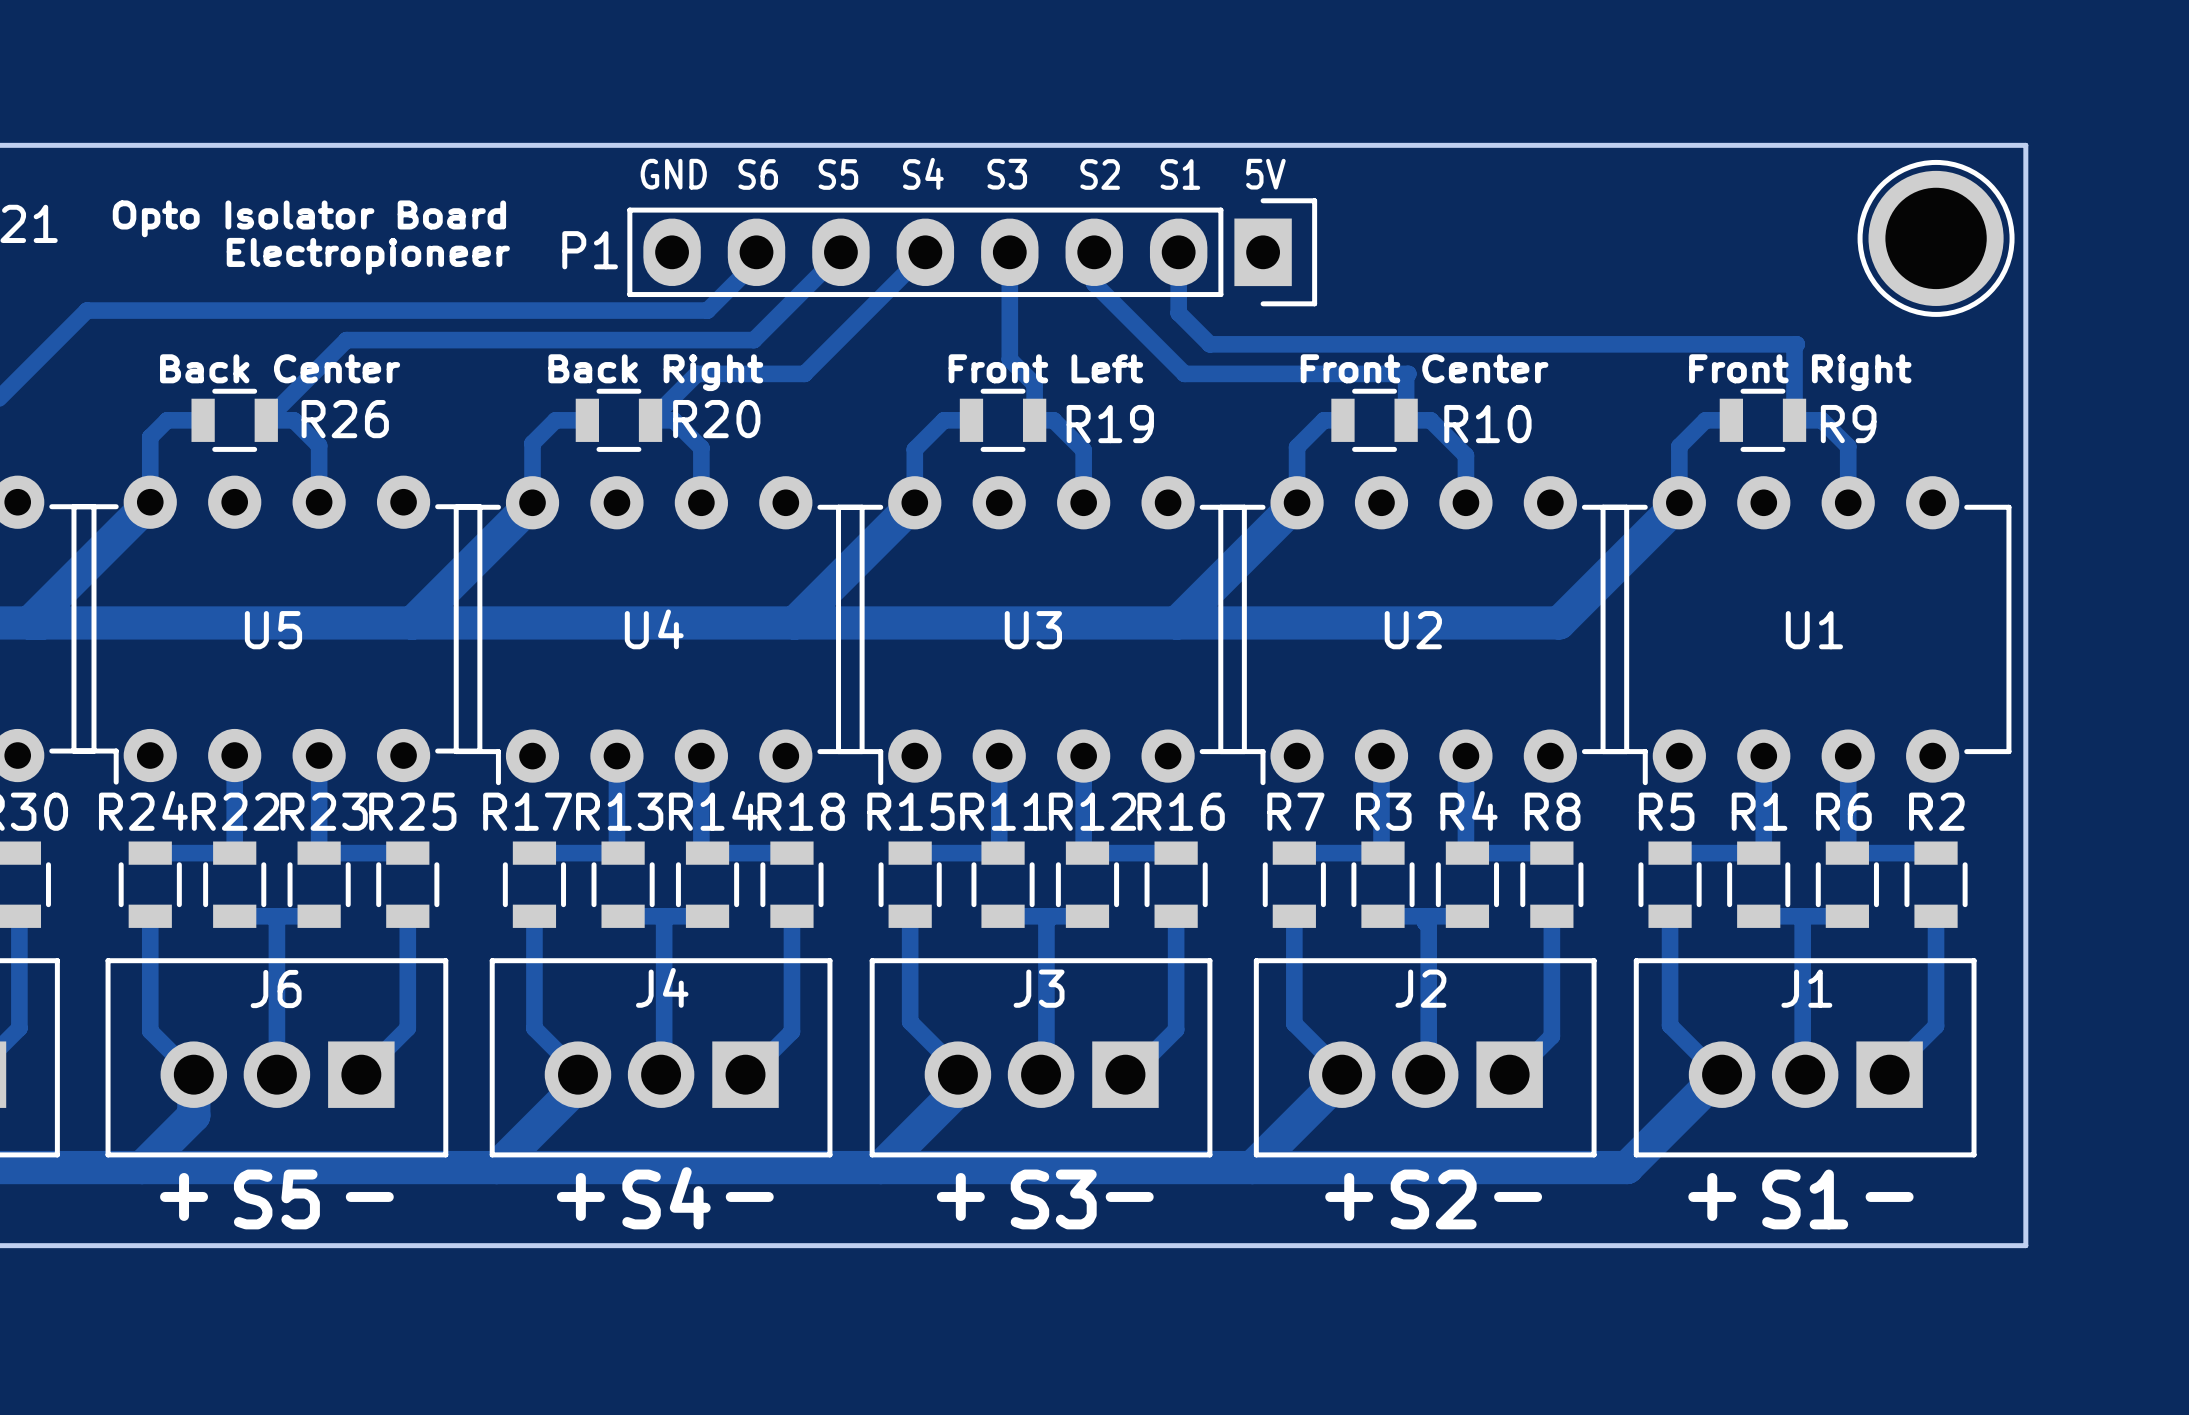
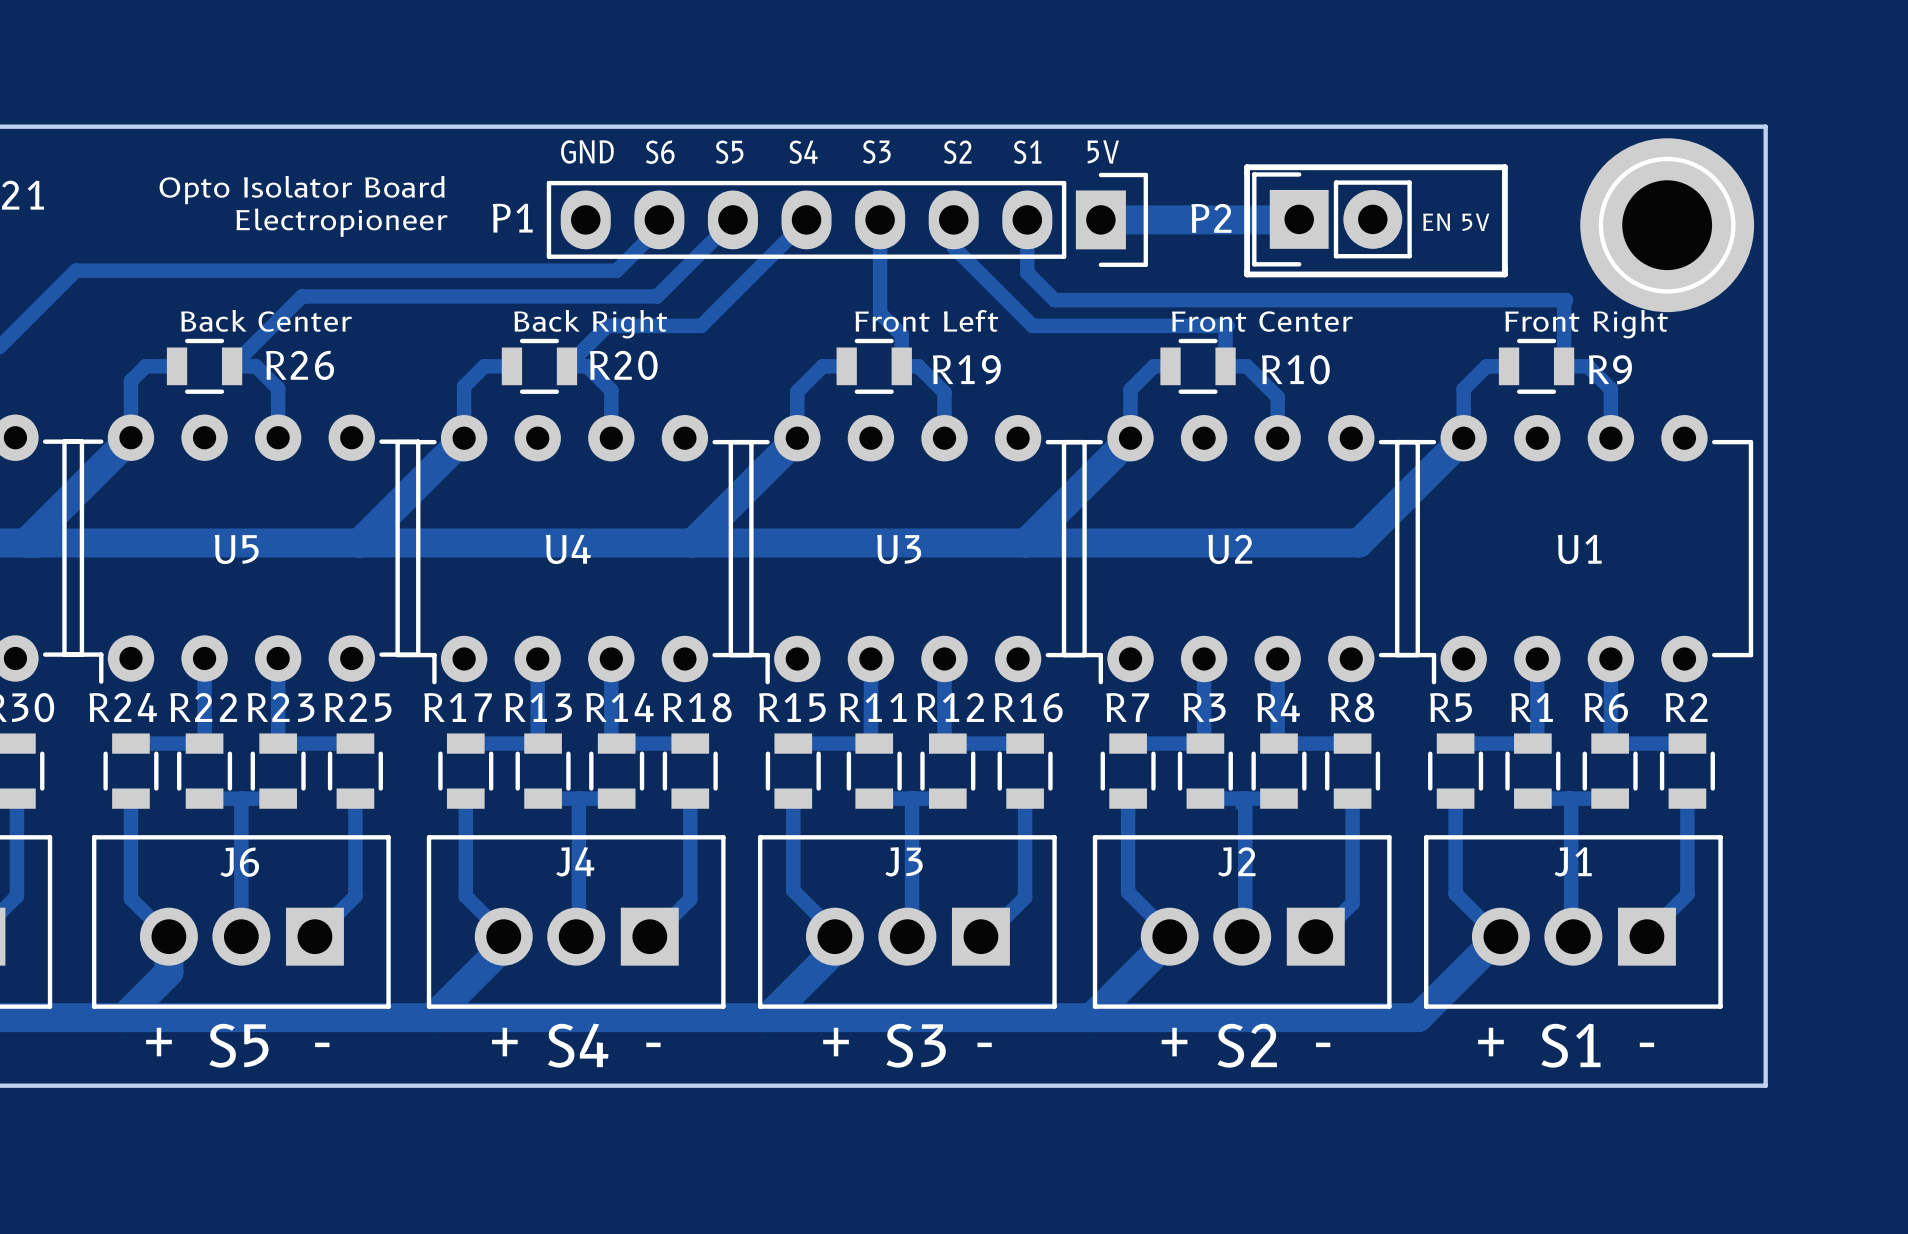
part footprint: [1857, 159, 2015, 317] -> [1580, 138, 1755, 313]
line: none -> (1247, 167) (1247, 274) (1504, 274) (1504, 167) (1247, 167)
track: none -> (1299, 219) (1100, 219)
P2: none -> (1331, 219)
text: none -> EN 5V (1456, 222)

